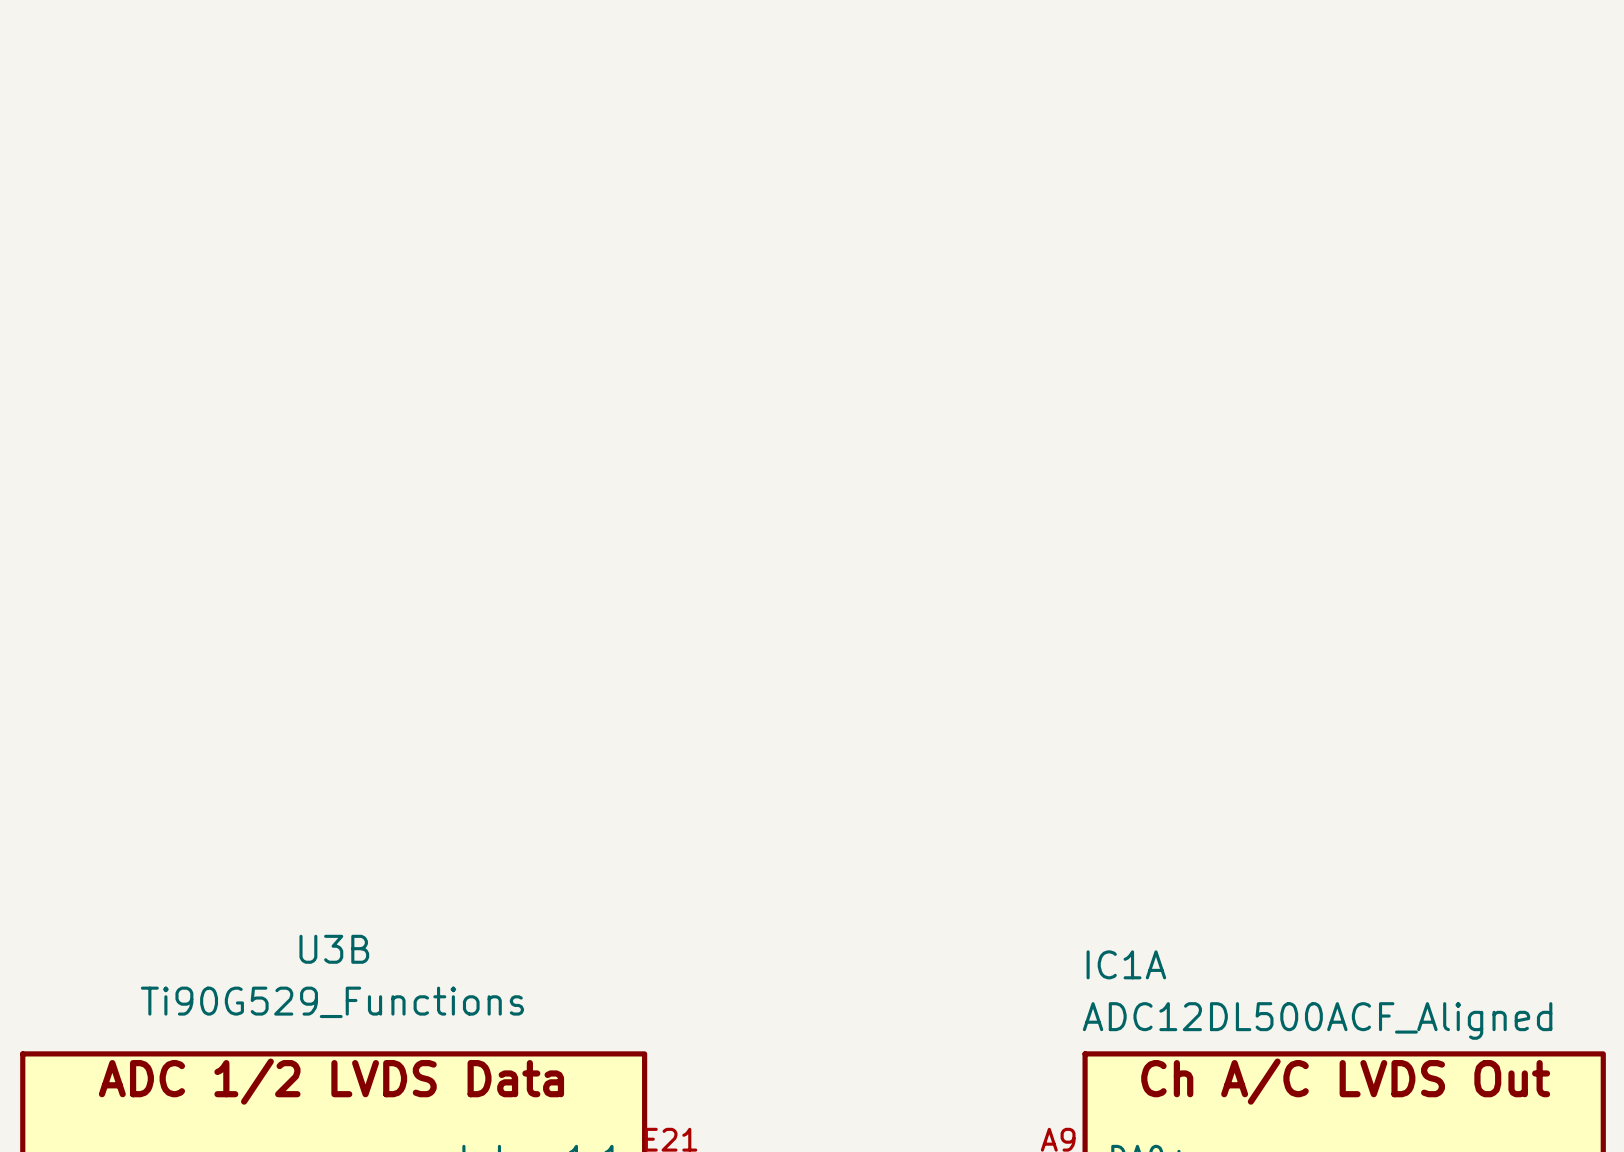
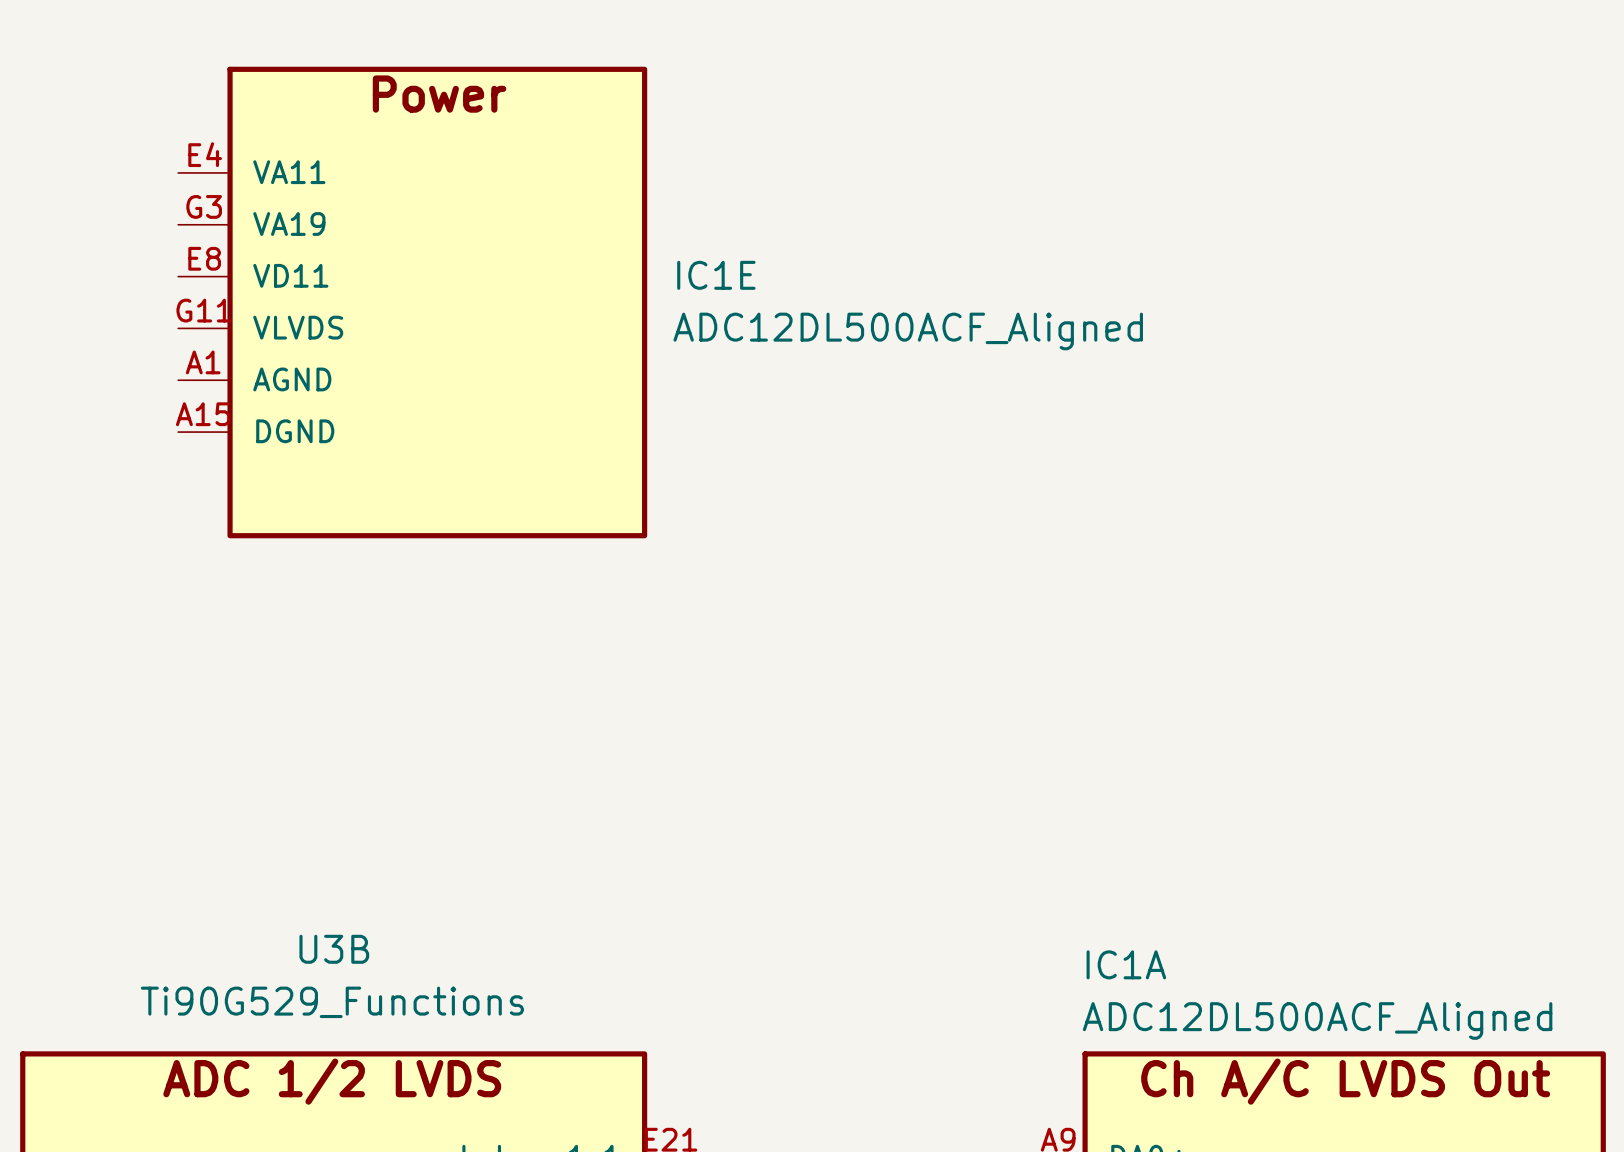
IC1E: none -> ADC12DL500ACF_Aligned (412, 302)
U3B text: ADC 1/2 LVDS Data (331, 1081) -> ADC 1/2 LVDS (332, 1081)

